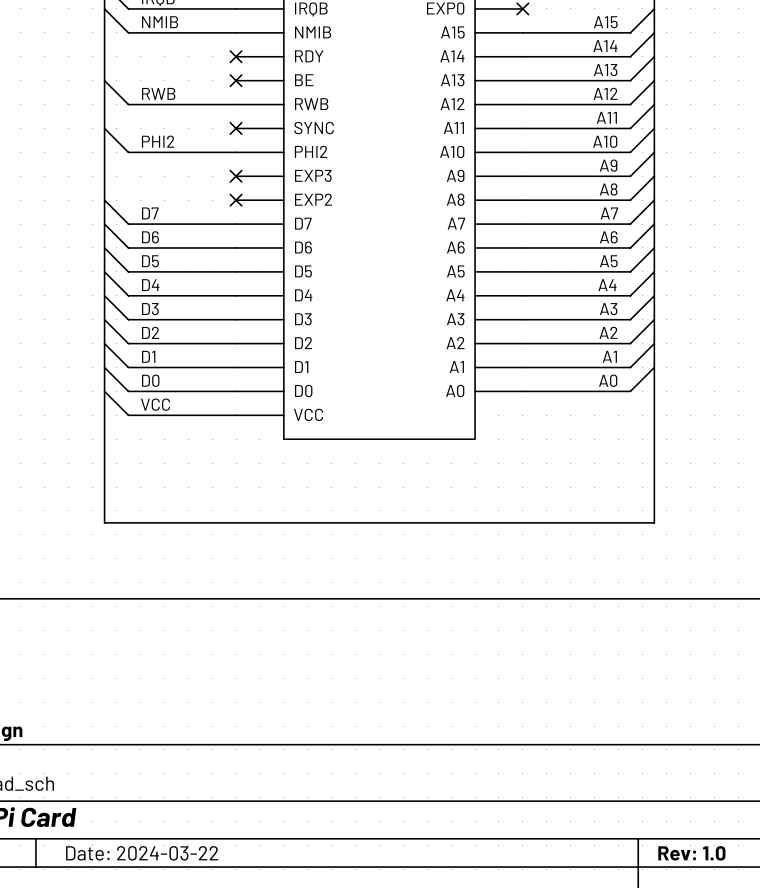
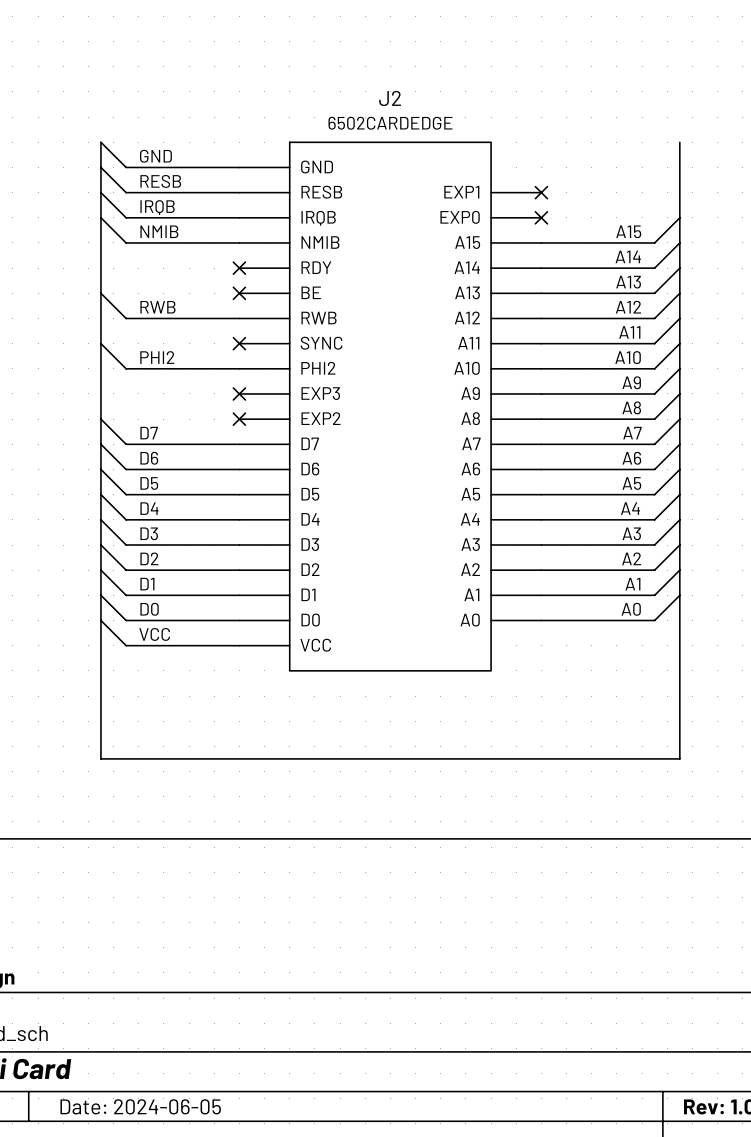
title block: Date: 2024-03-22 (142, 853) -> Date: 2024-06-05 (140, 1106)

